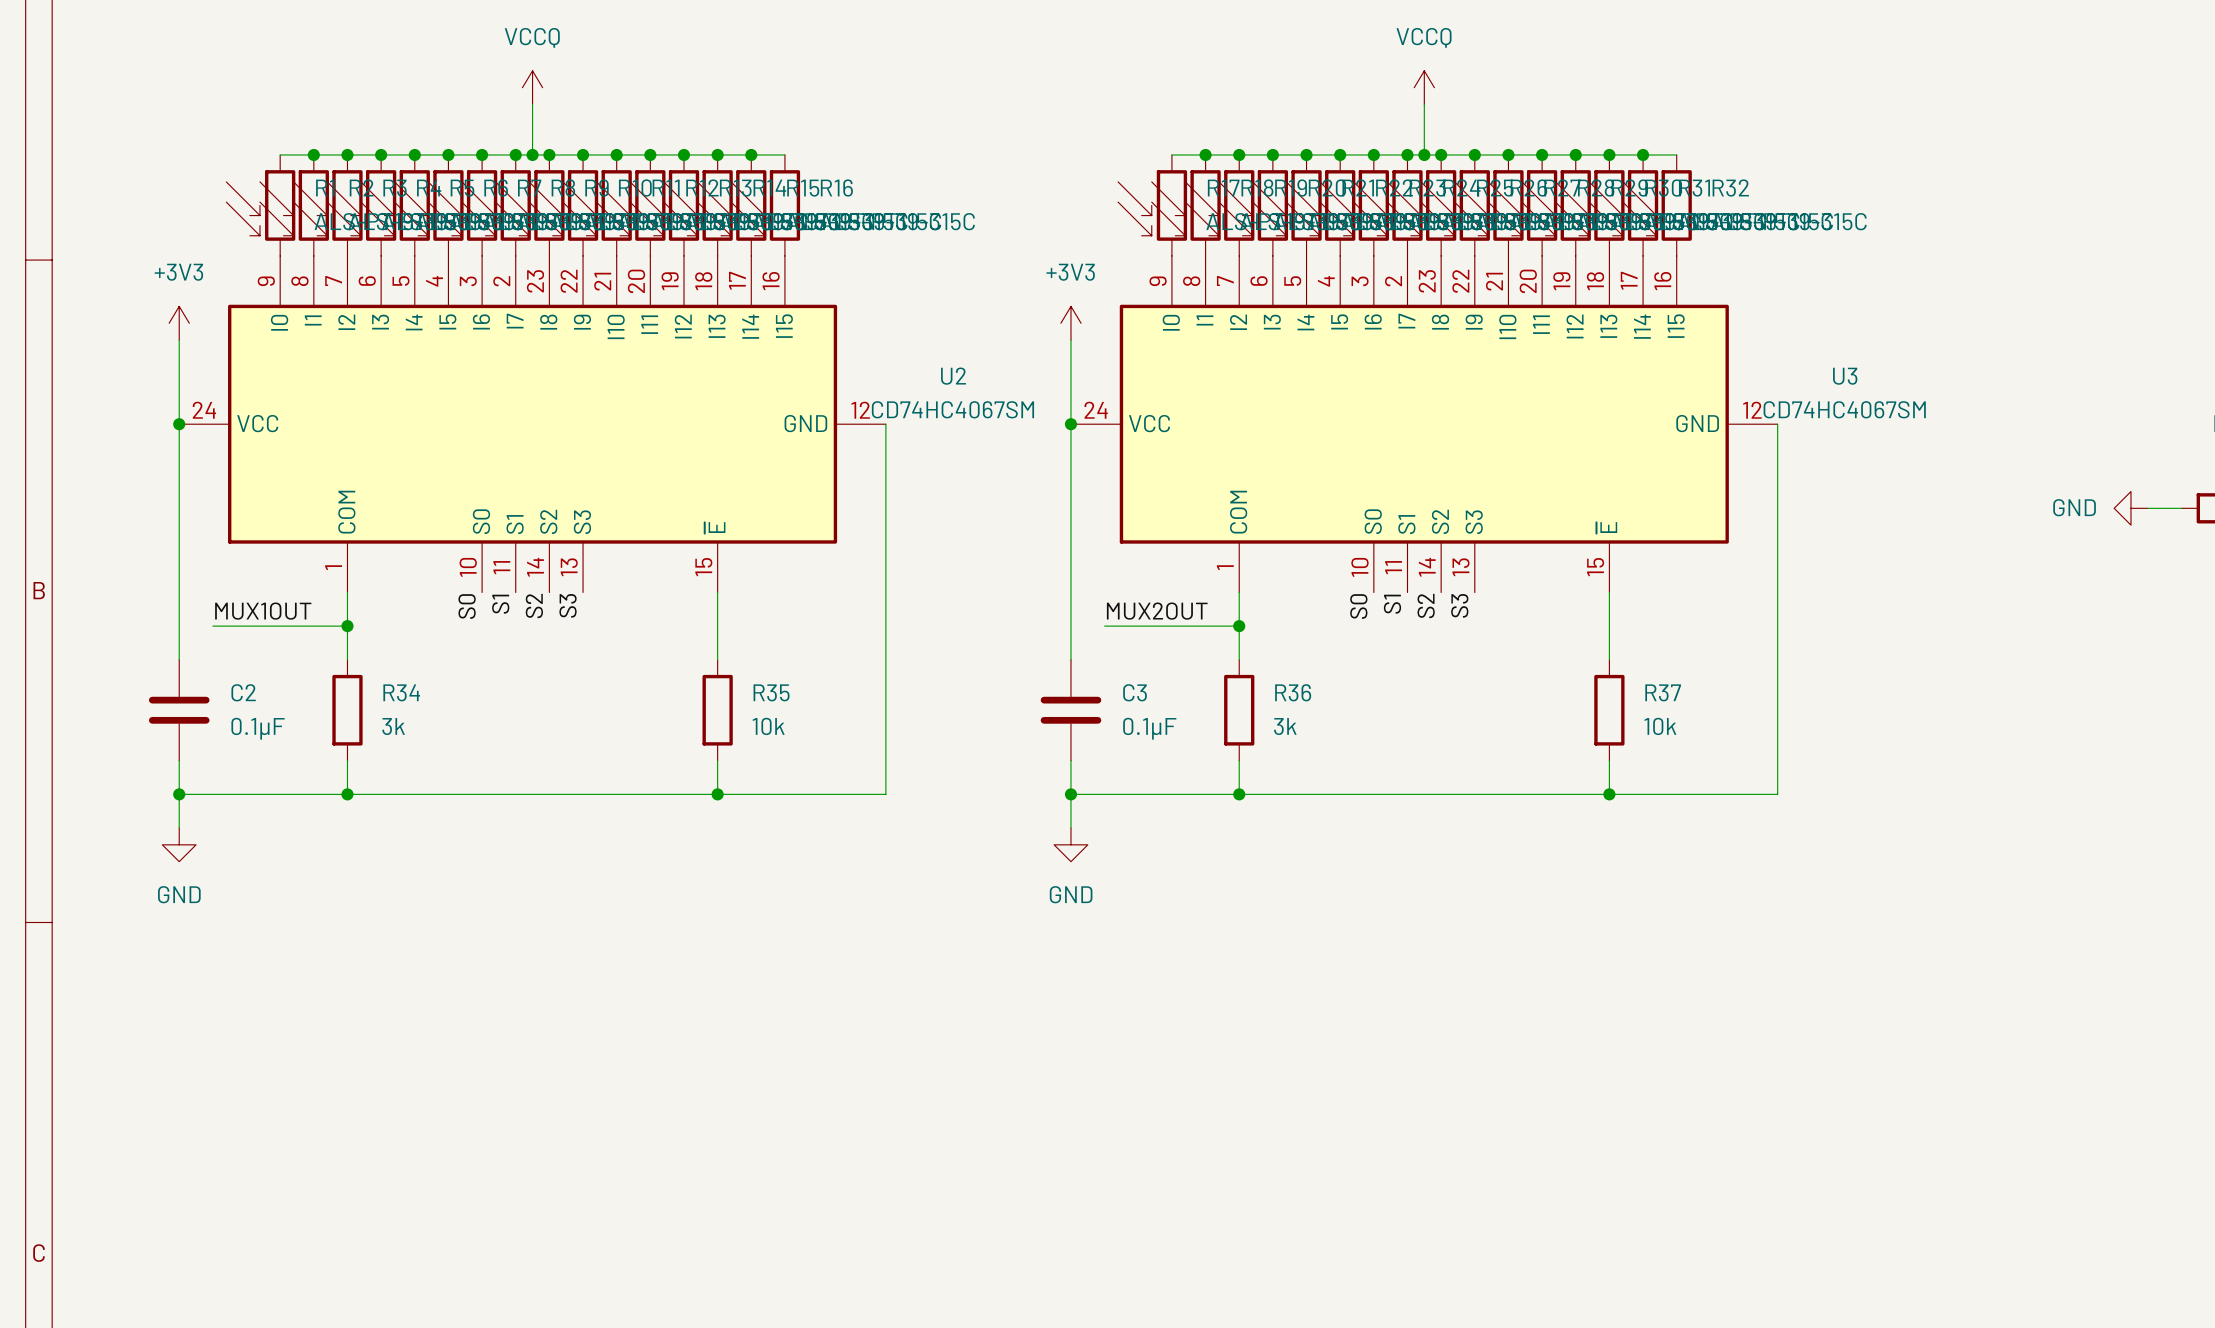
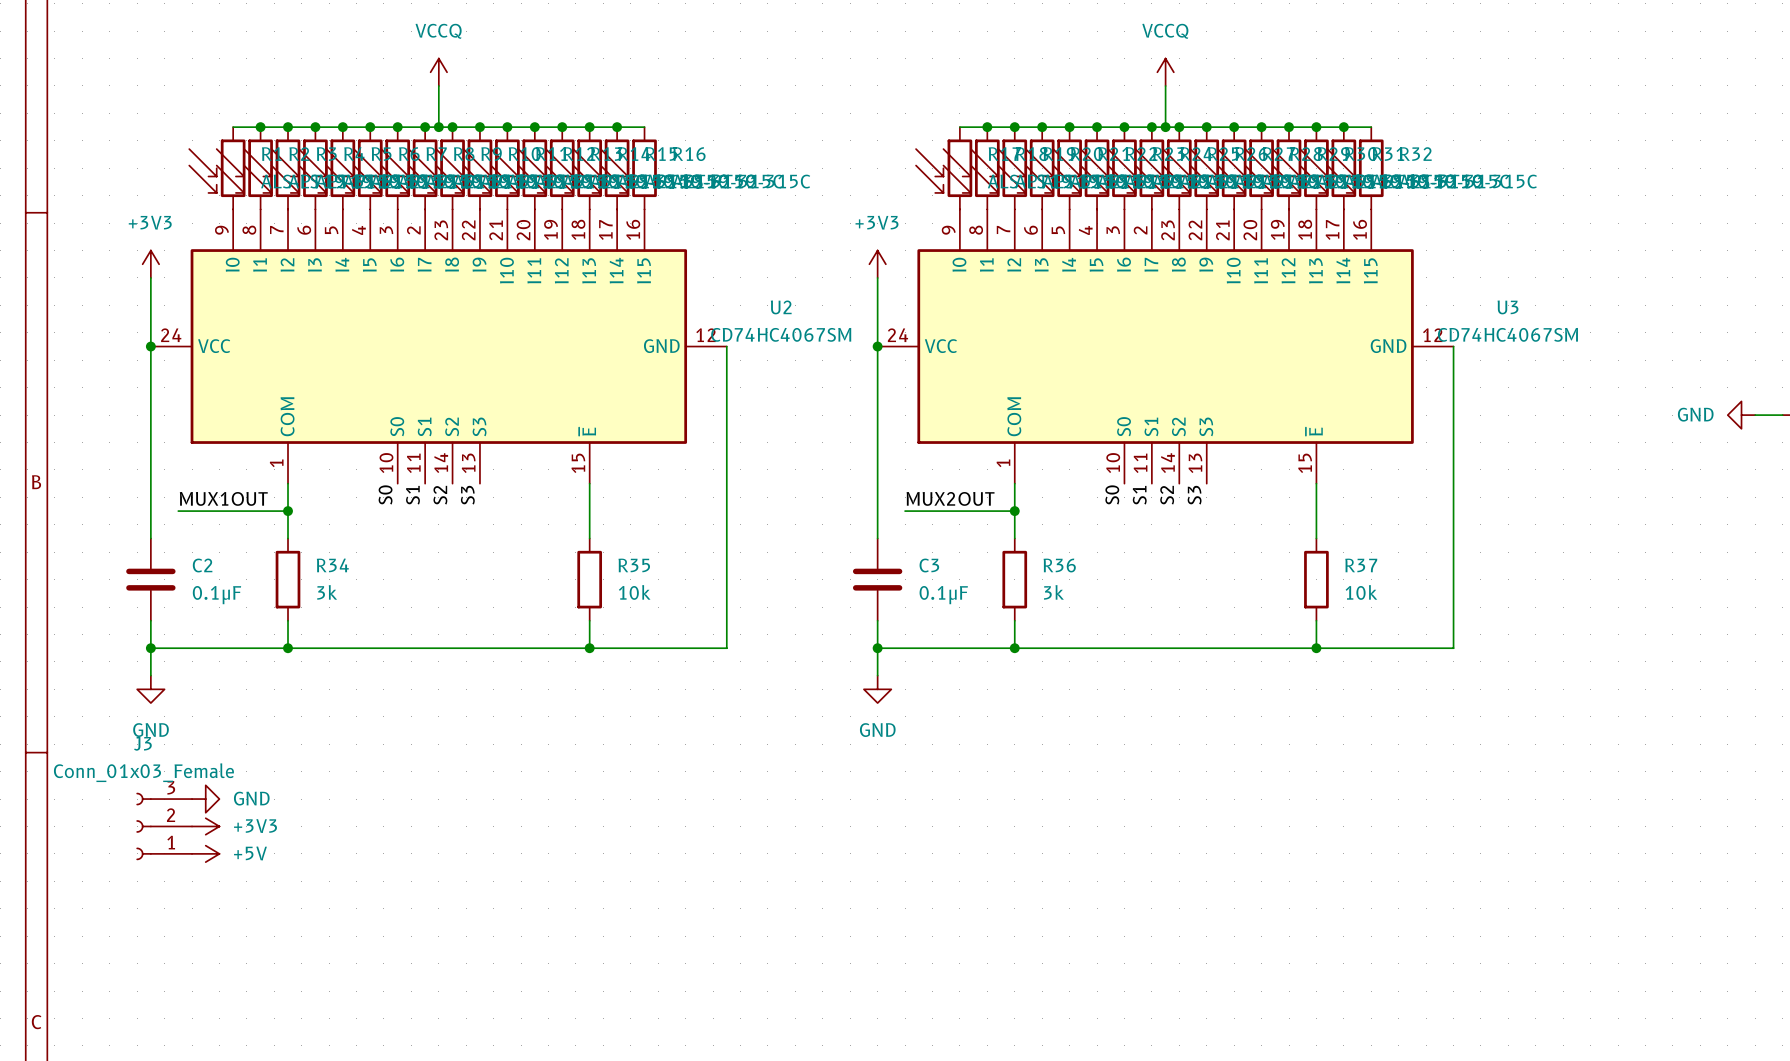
power symbol: none -> GND (205, 799)
J3: none -> Conn_01x03_Female (164, 826)
power symbol: none -> +3V3 (205, 826)
power symbol: none -> +5V (205, 853)

